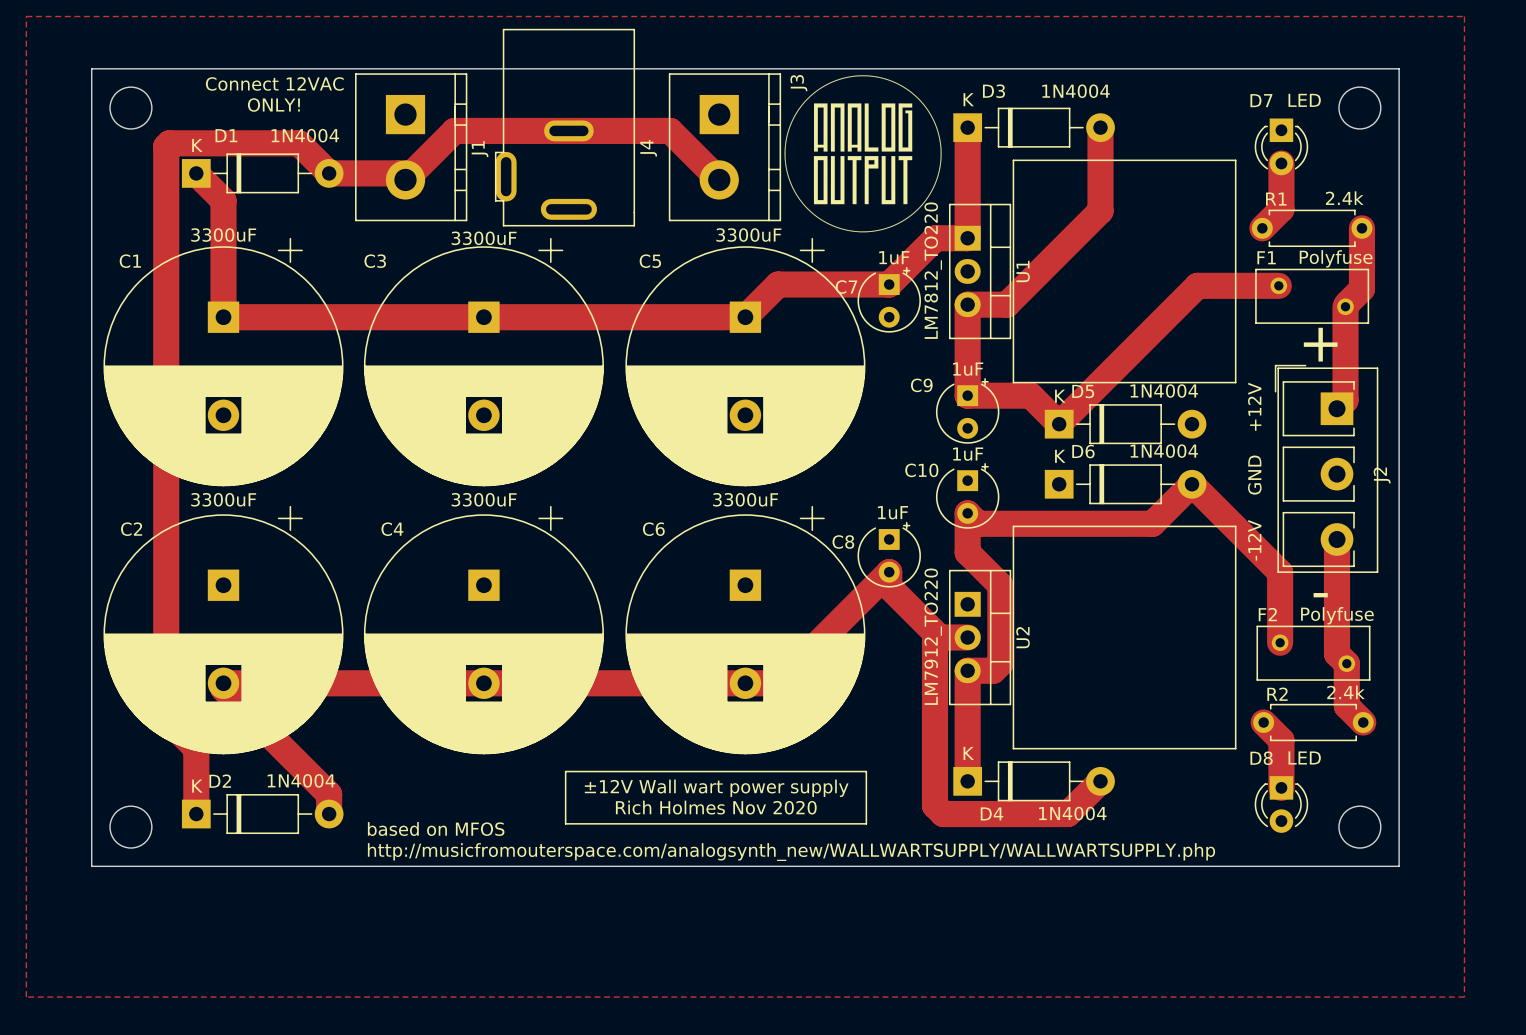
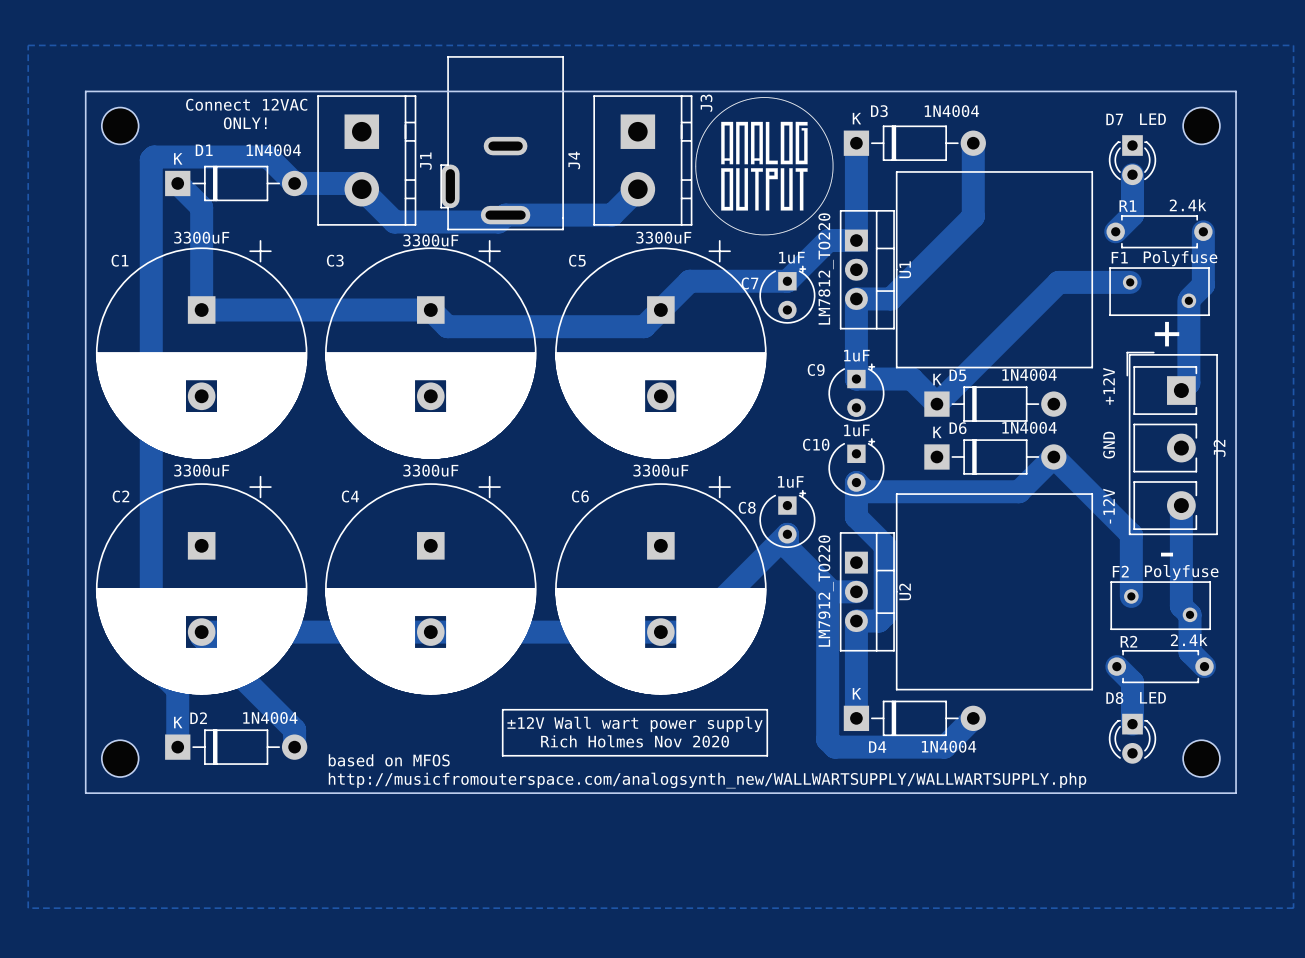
track: (405, 179) (454, 130) (670, 130) (719, 179) -> (361, 189) (394, 222) (498, 222) (505, 215) (611, 215) (637, 189)
track: (483, 317) (745, 317) -> (430, 310) (447, 326) (644, 326) (660, 310)

